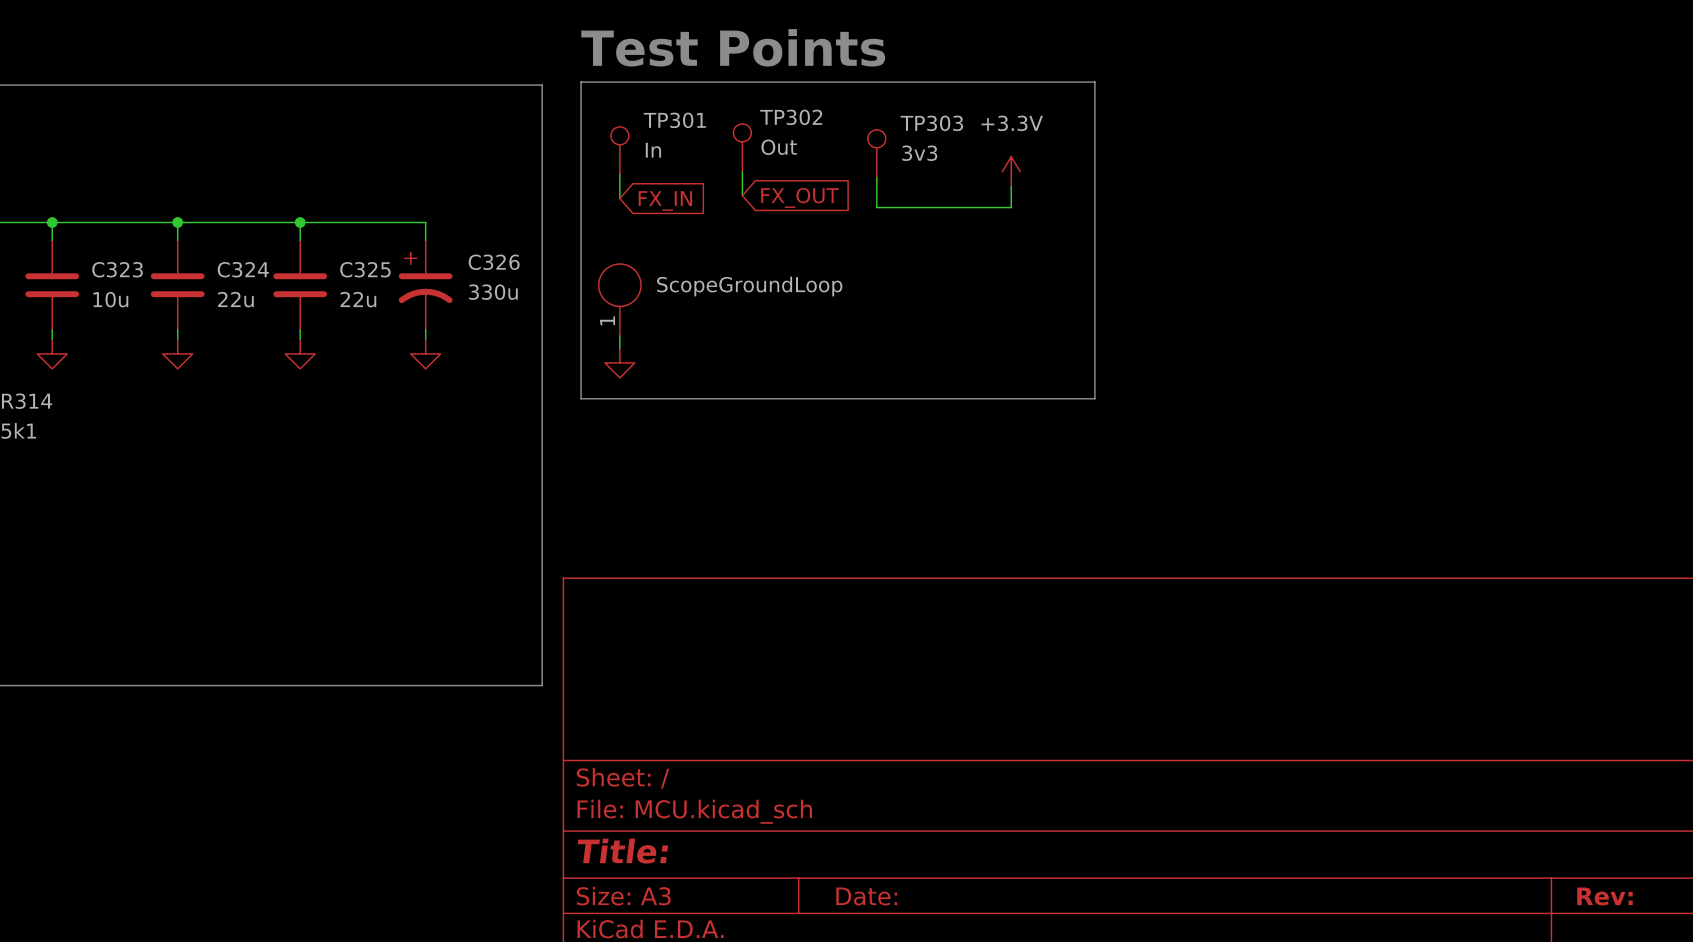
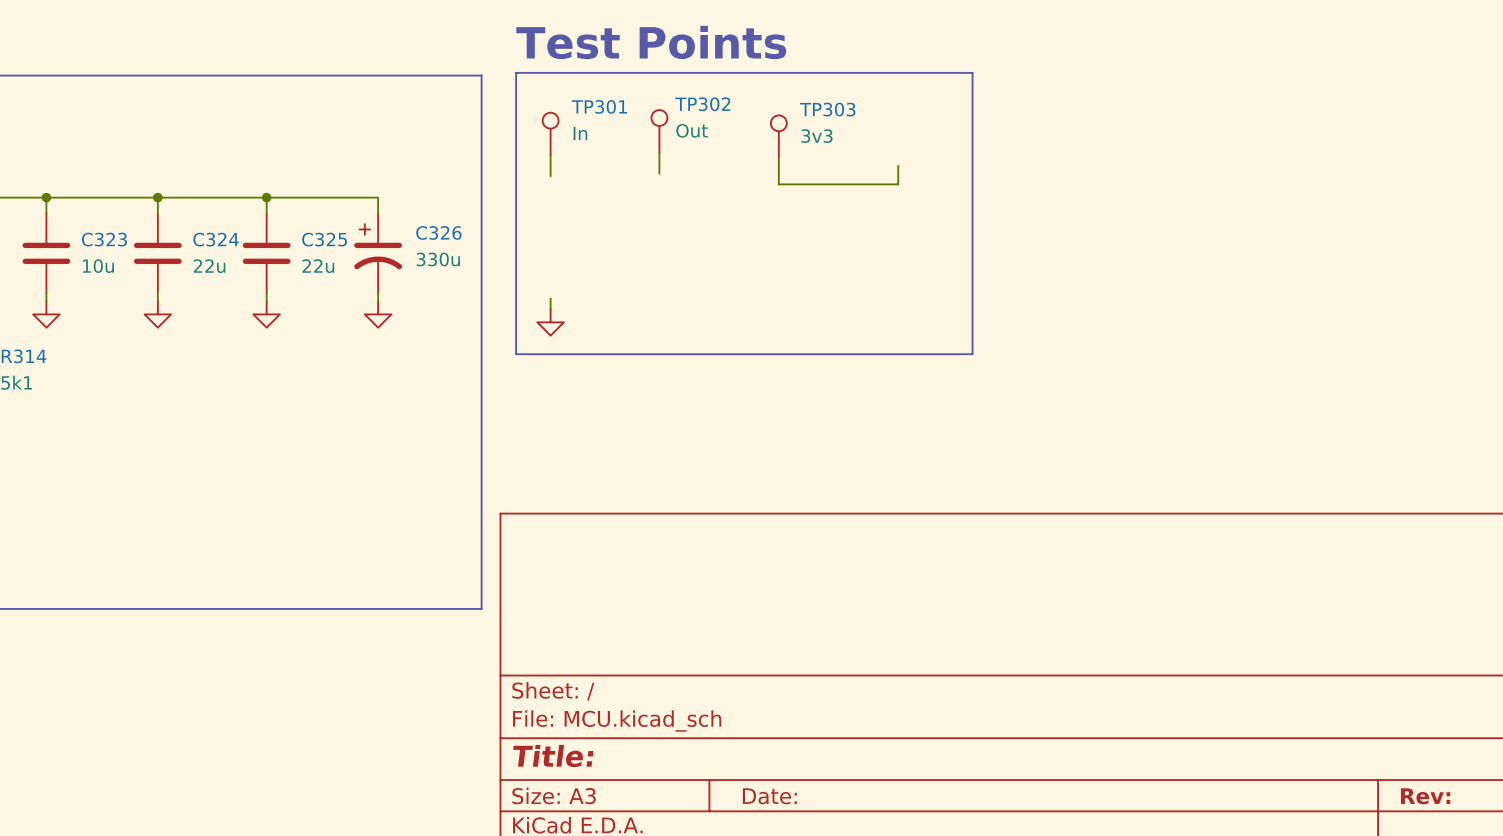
power symbol: +3.3V (1011, 171) -> none
global label: FX_OUT (800, 197) -> none
global label: FX_IN (665, 201) -> none
part: ScopeGroundLoop (619, 300) -> none

